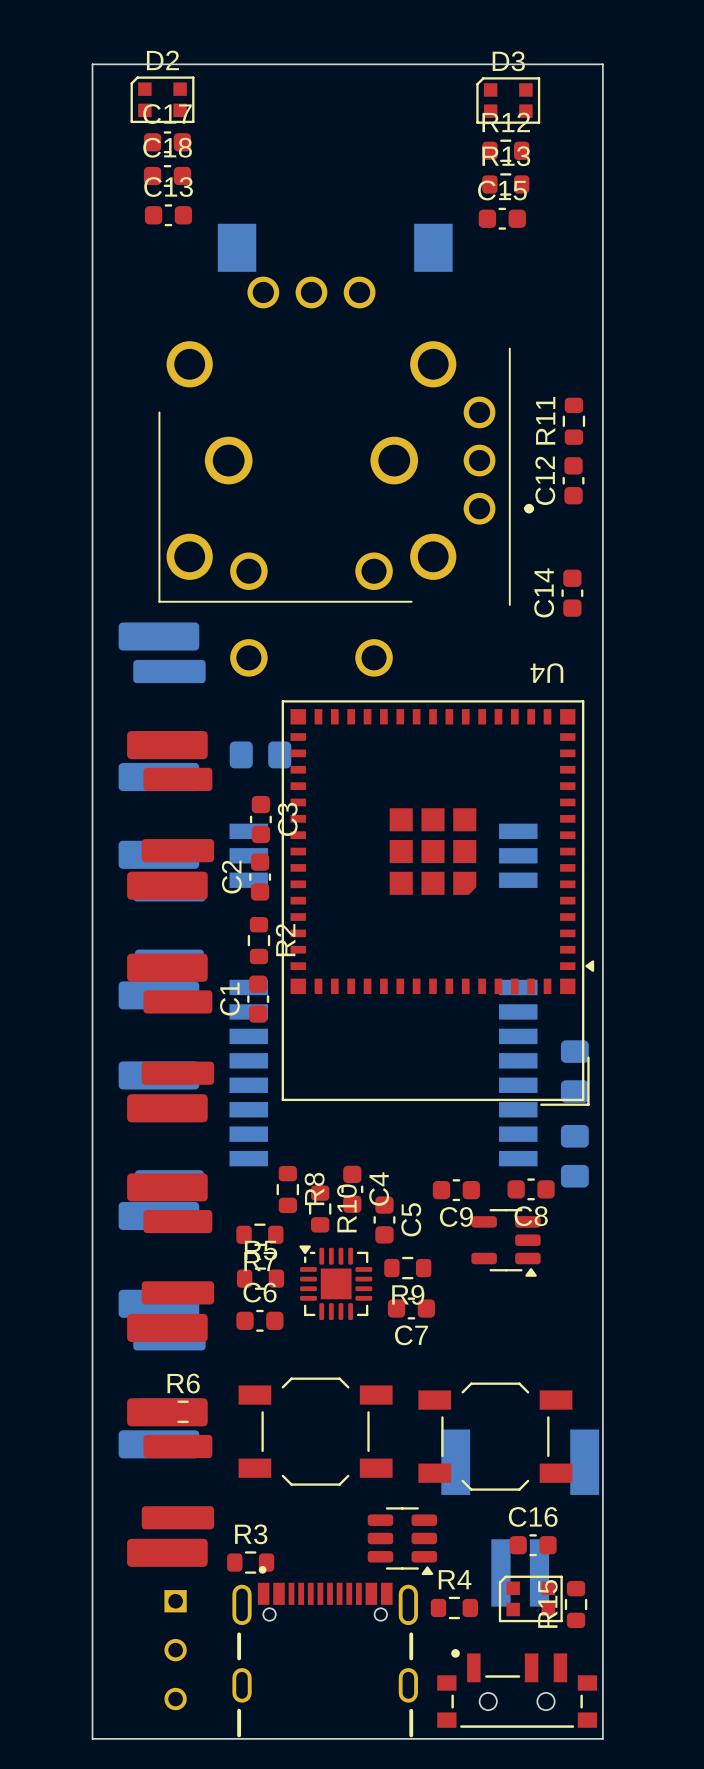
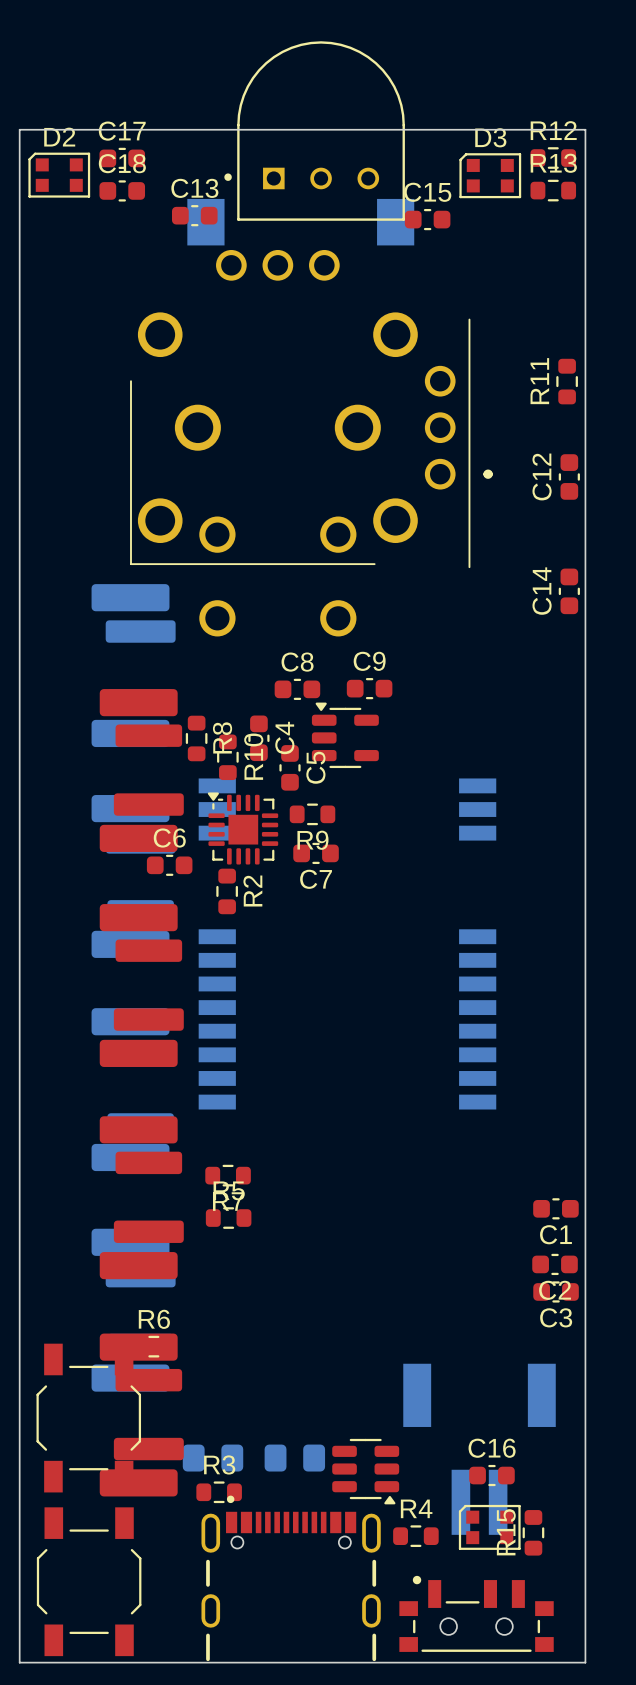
D2 position: (162, 99) -> (59, 175)
D3 position: (508, 100) -> (490, 175)
C17 position: (167, 142) -> (122, 158)
R12 position: (505, 150) -> (553, 158)
part: none -> (314, 131)
C18 position: (167, 176) -> (122, 190)
R13 position: (505, 184) -> (553, 190)
C13 position: (168, 215) -> (194, 215)
C15 position: (502, 218) -> (427, 219)
R11 position: (573, 421) -> (567, 381)
C12 position: (573, 480) -> (569, 476)
C14 position: (572, 593) -> (569, 591)
part: (260, 754) -> none
C3 rotation: 0° (260, 819) -> 90° clockwise (556, 1291)
C3 position: (260, 819) -> (556, 1291)
C2 name position: C2 (231, 877) -> C2 (555, 1290)
C2 rotation: 0° (260, 877) -> 90° clockwise (555, 1264)
C2 position: (260, 877) -> (555, 1264)
U4: (437, 903) -> none
C1 name position: C1 (229, 999) -> C1 (555, 1234)
C1 rotation: 0° (258, 999) -> 90° clockwise (555, 1208)
C1 position: (258, 999) -> (555, 1208)
part: (574, 1071) -> none
part: (574, 1156) -> none
R8 position: (287, 1189) -> (196, 738)
C4 position: (352, 1189) -> (258, 738)
C8 position: (531, 1189) -> (297, 689)
C9 position: (456, 1190) -> (369, 688)
R10 position: (320, 1208) -> (227, 757)
C9 name position: C9 (456, 1216) -> C9 (369, 661)
C8 name position: C8 (531, 1216) -> C8 (297, 662)
C5 position: (384, 1219) -> (290, 767)
part rotation: 0° (506, 1242) -> 180° (345, 735)
part position: (506, 1242) -> (345, 735)
R9 position: (407, 1268) -> (312, 814)
part position: (335, 1282) -> (242, 828)
C7 position: (411, 1308) -> (316, 853)
C6 position: (259, 1320) -> (169, 865)
part: (315, 1431) -> none
part: (495, 1436) -> none
part: none -> (88, 1418)
part: none -> (213, 1458)
part: none -> (294, 1458)
part: (175, 1650) -> none
part: none -> (89, 1581)
board edge: (92, 1738) (92, 64) (602, 64) (602, 1738) -> (66, 1662) (19, 1662) (19, 129) (585, 129) (585, 1662) (559, 1662)

